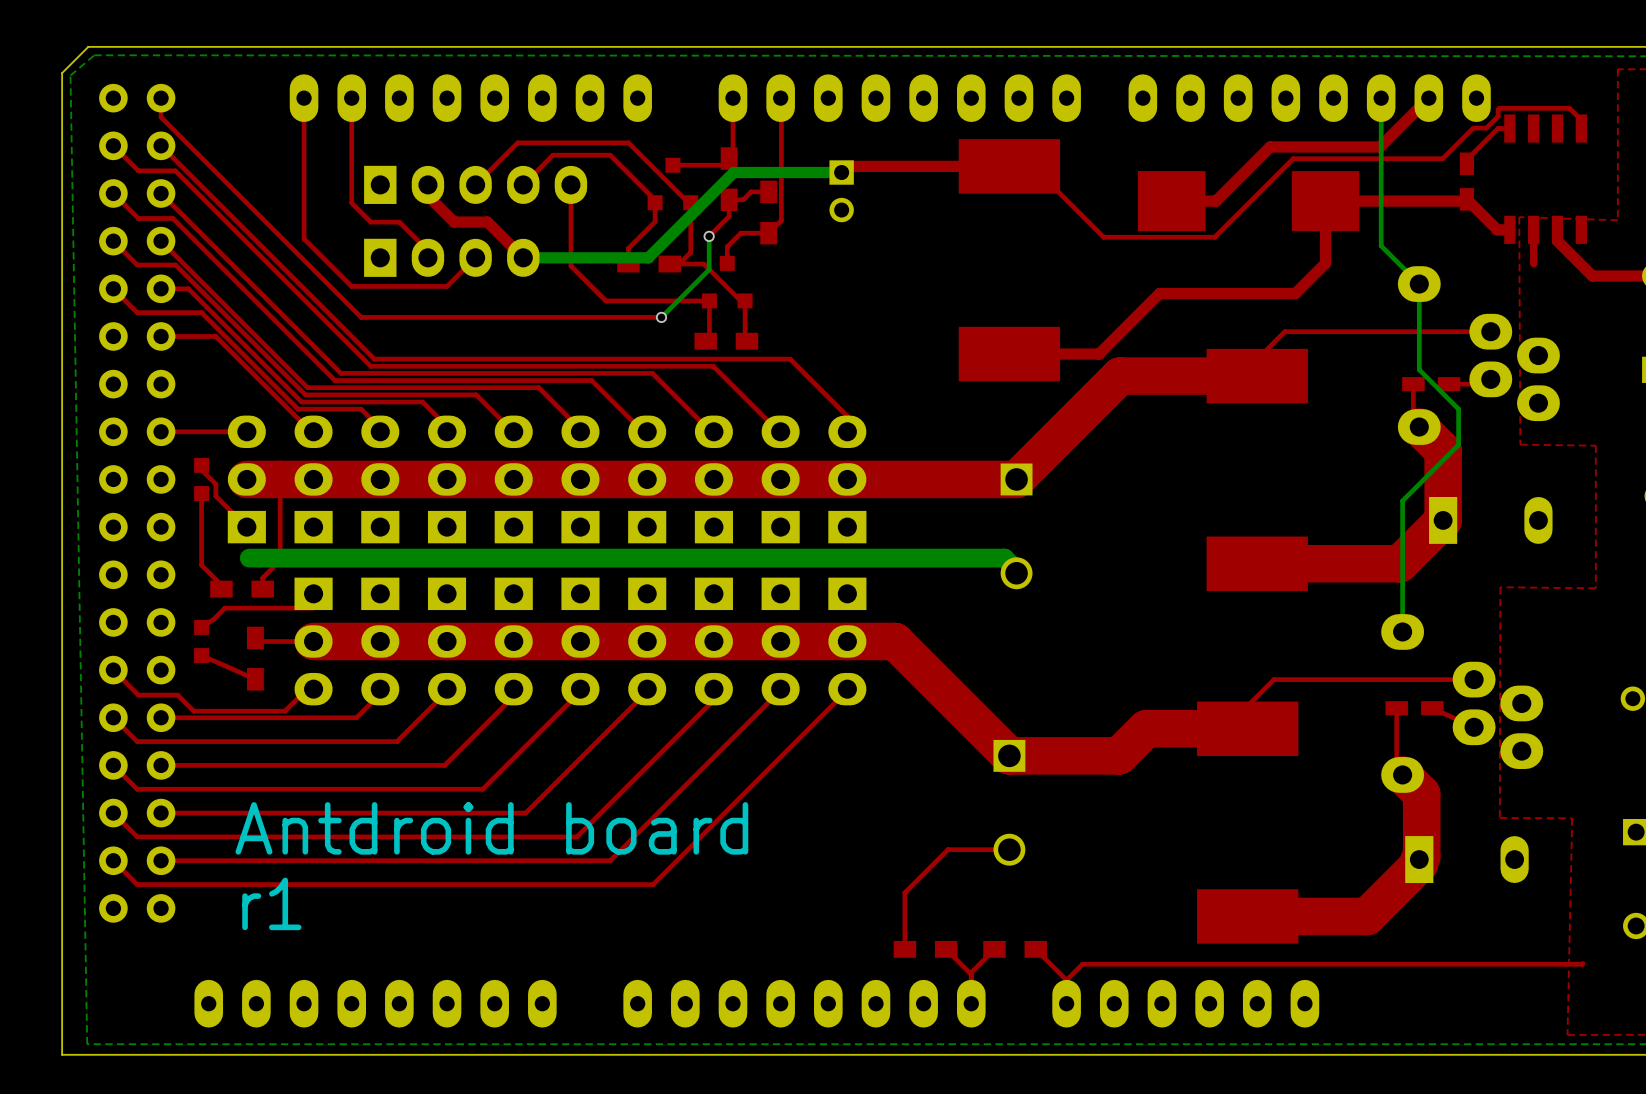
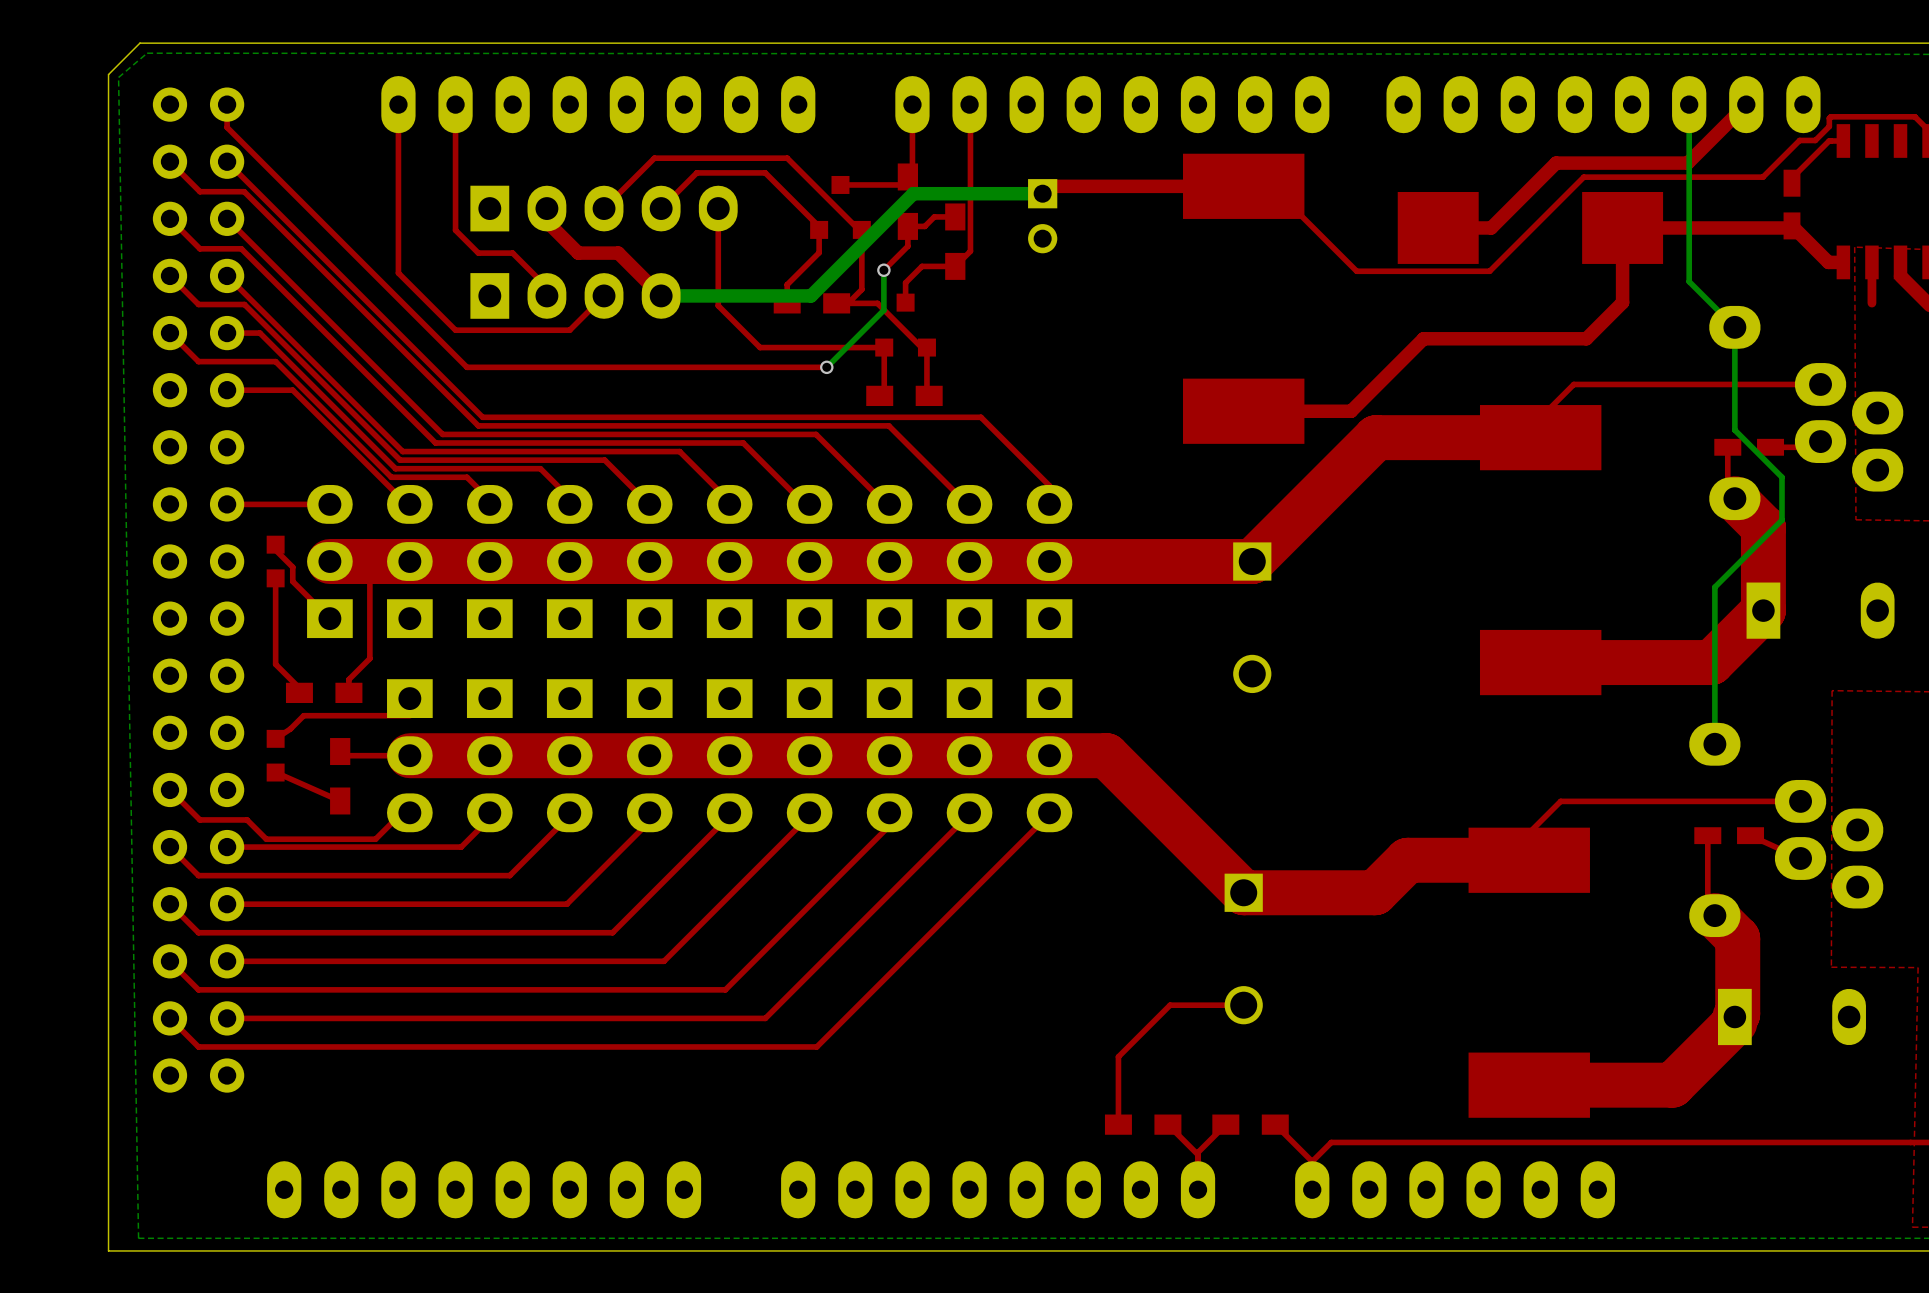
bottom track: (249, 558) (1004, 558) (1016, 570) (1016, 573) -> none
text: Antdroid board (491, 828) -> none
text: r1 (271, 903) -> none

